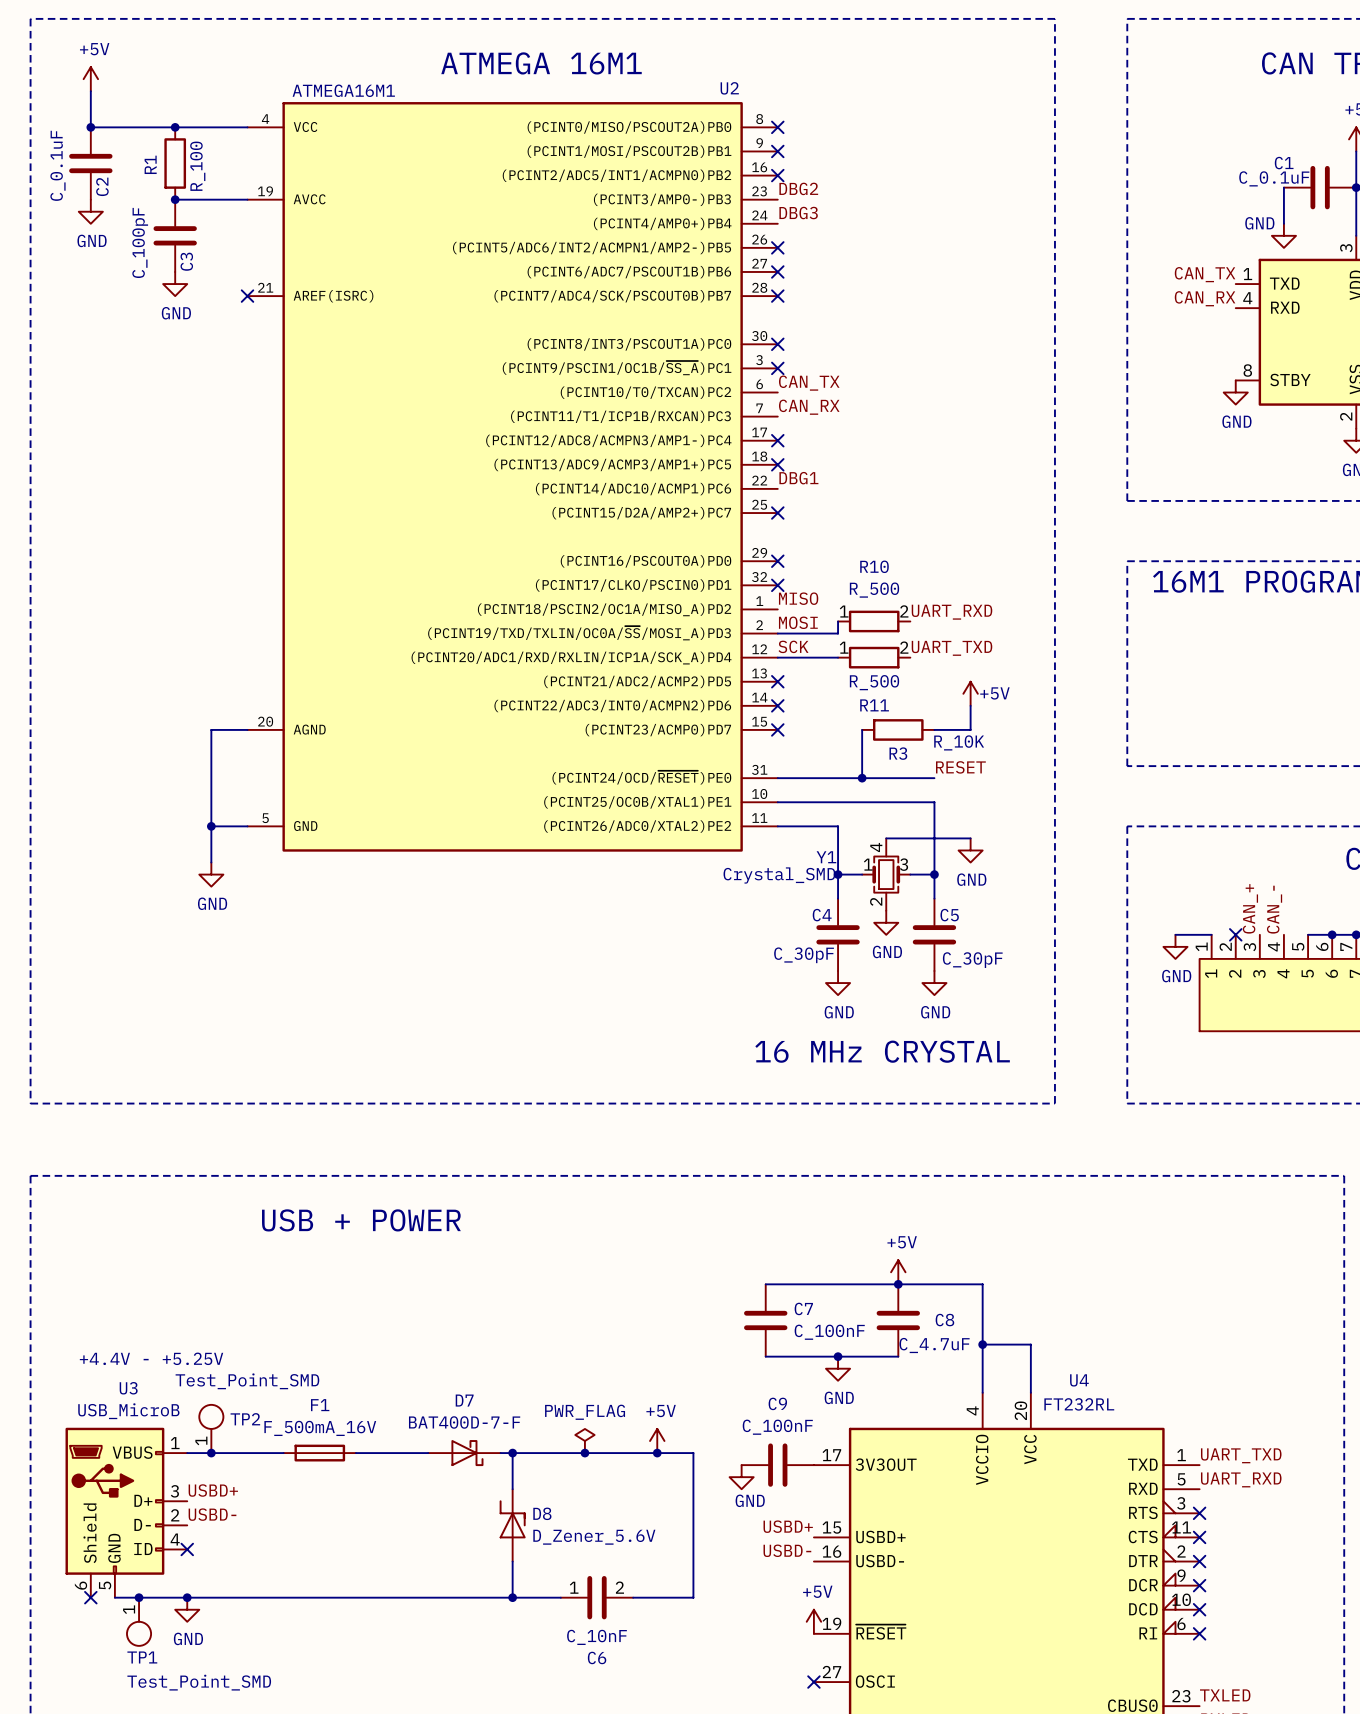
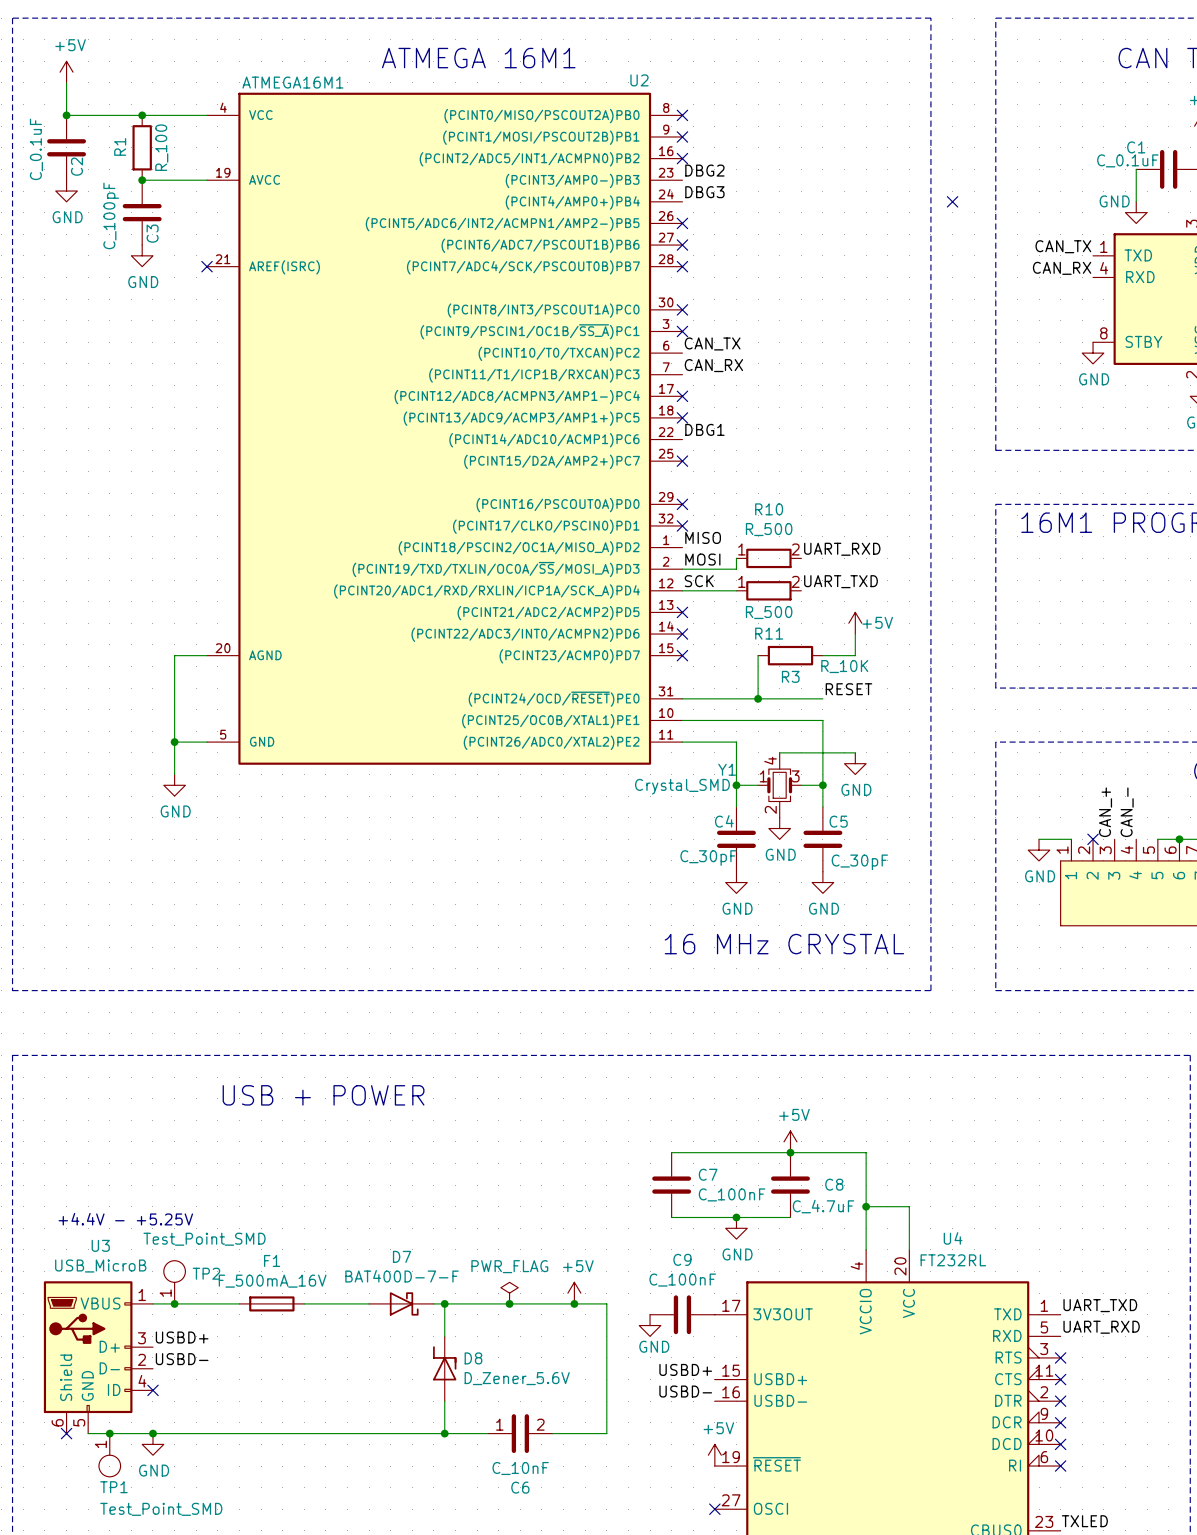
no-connect mark: none -> (952, 201)

